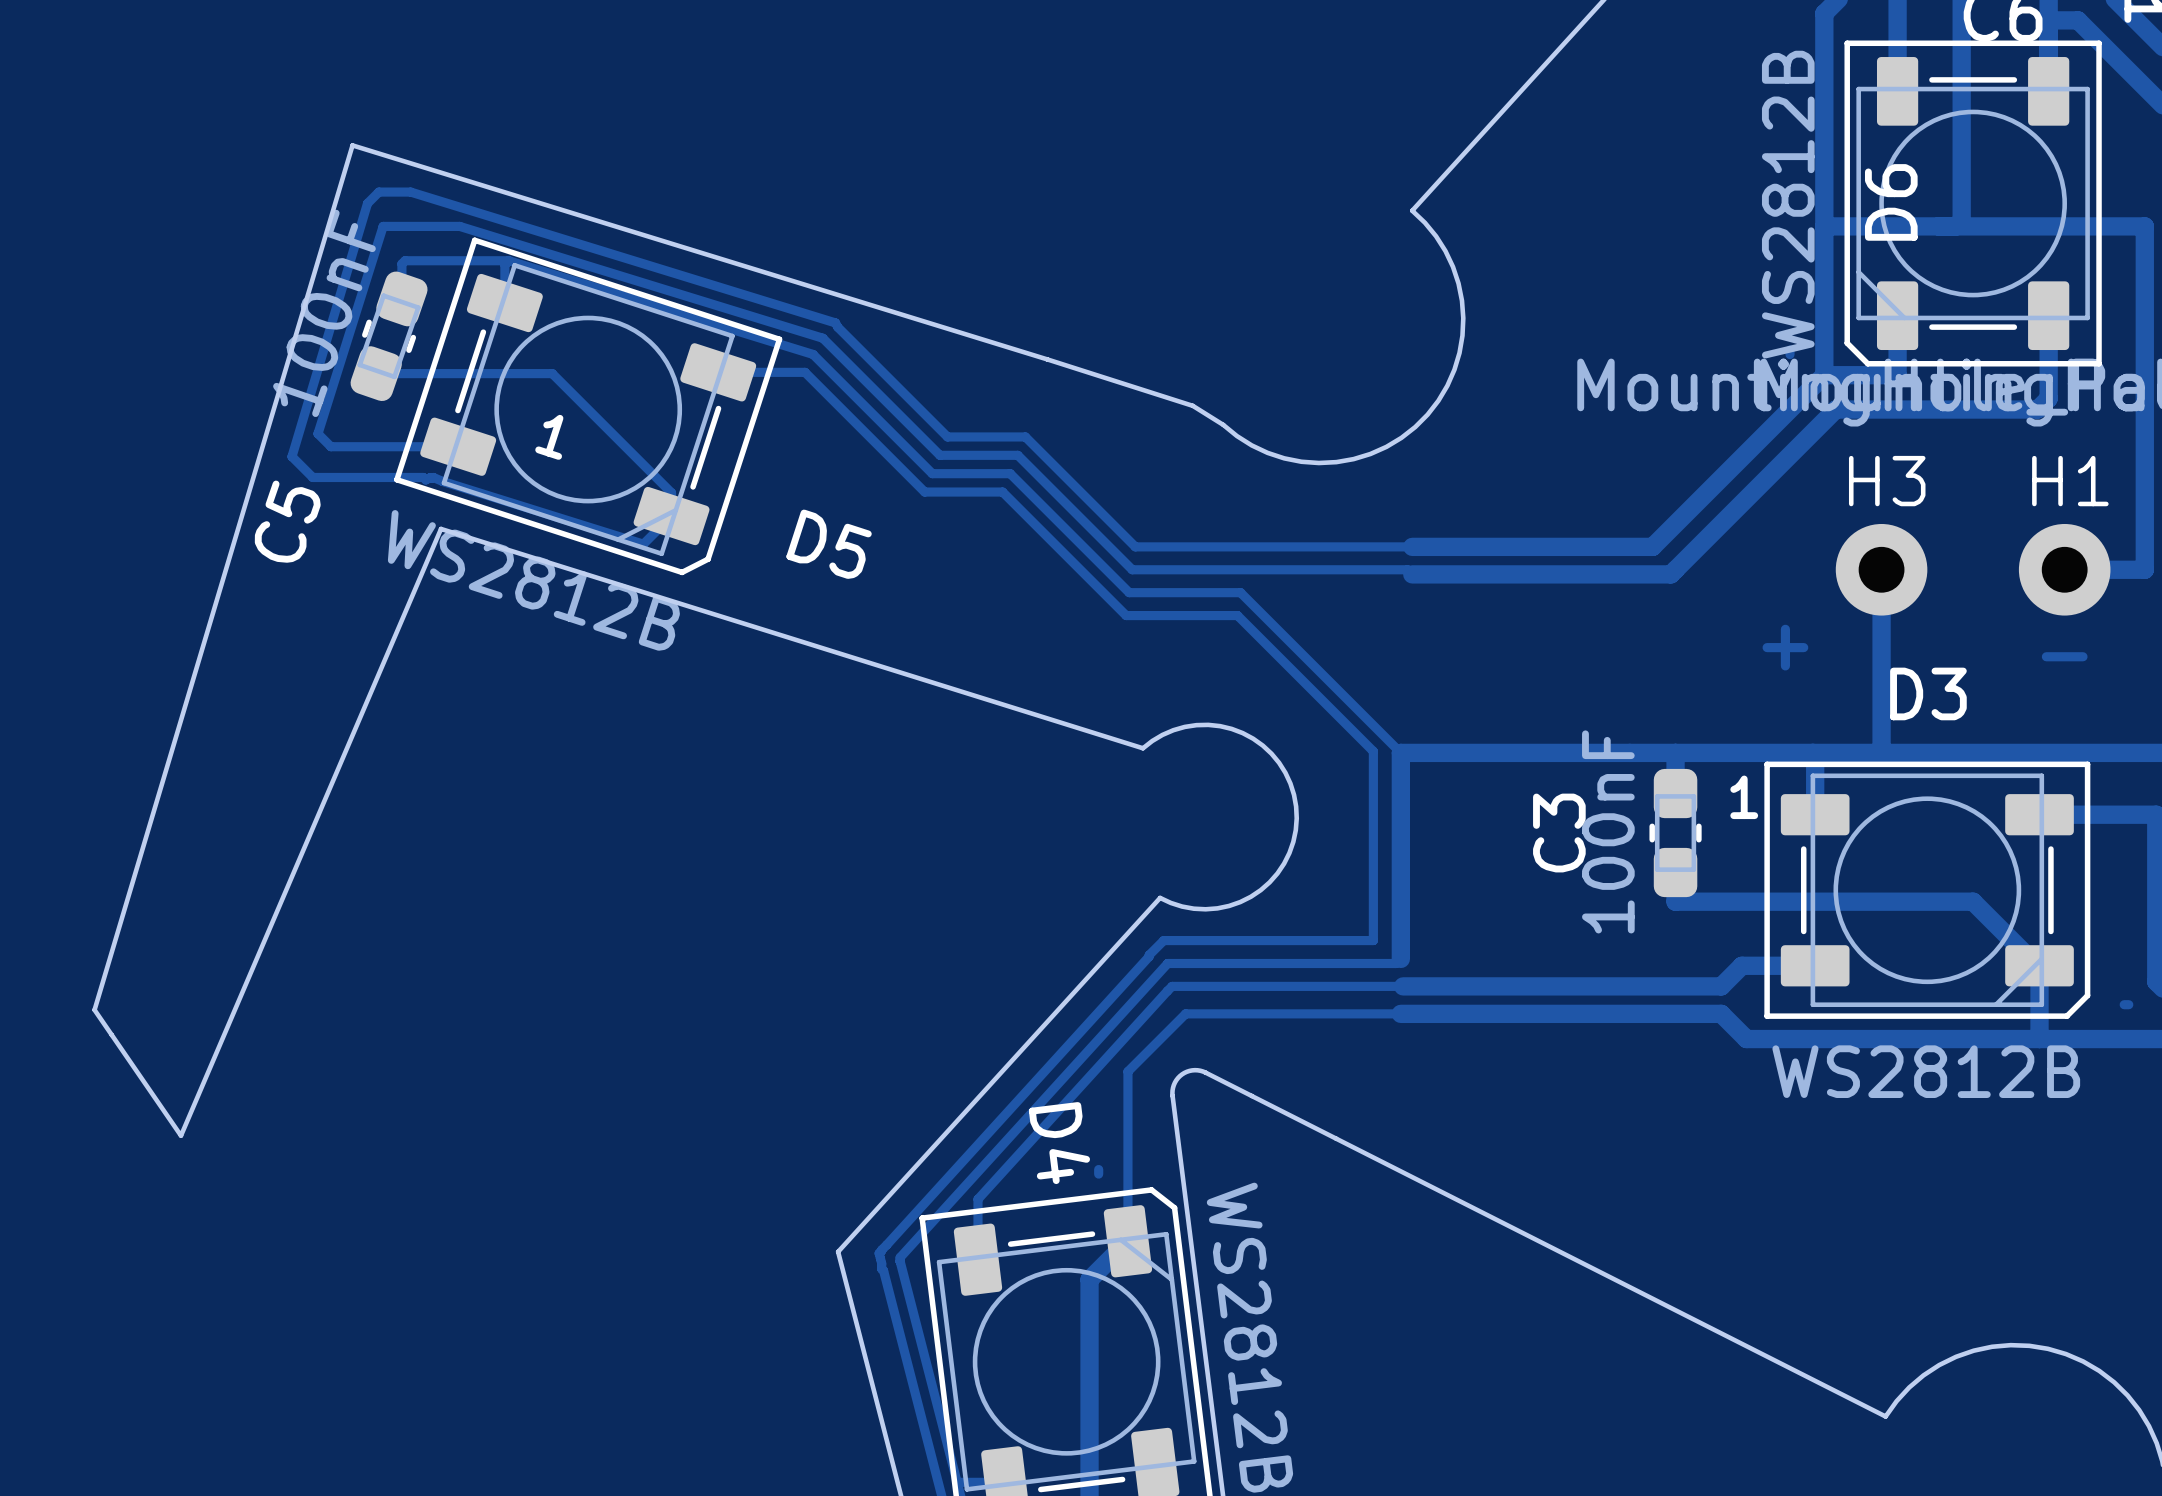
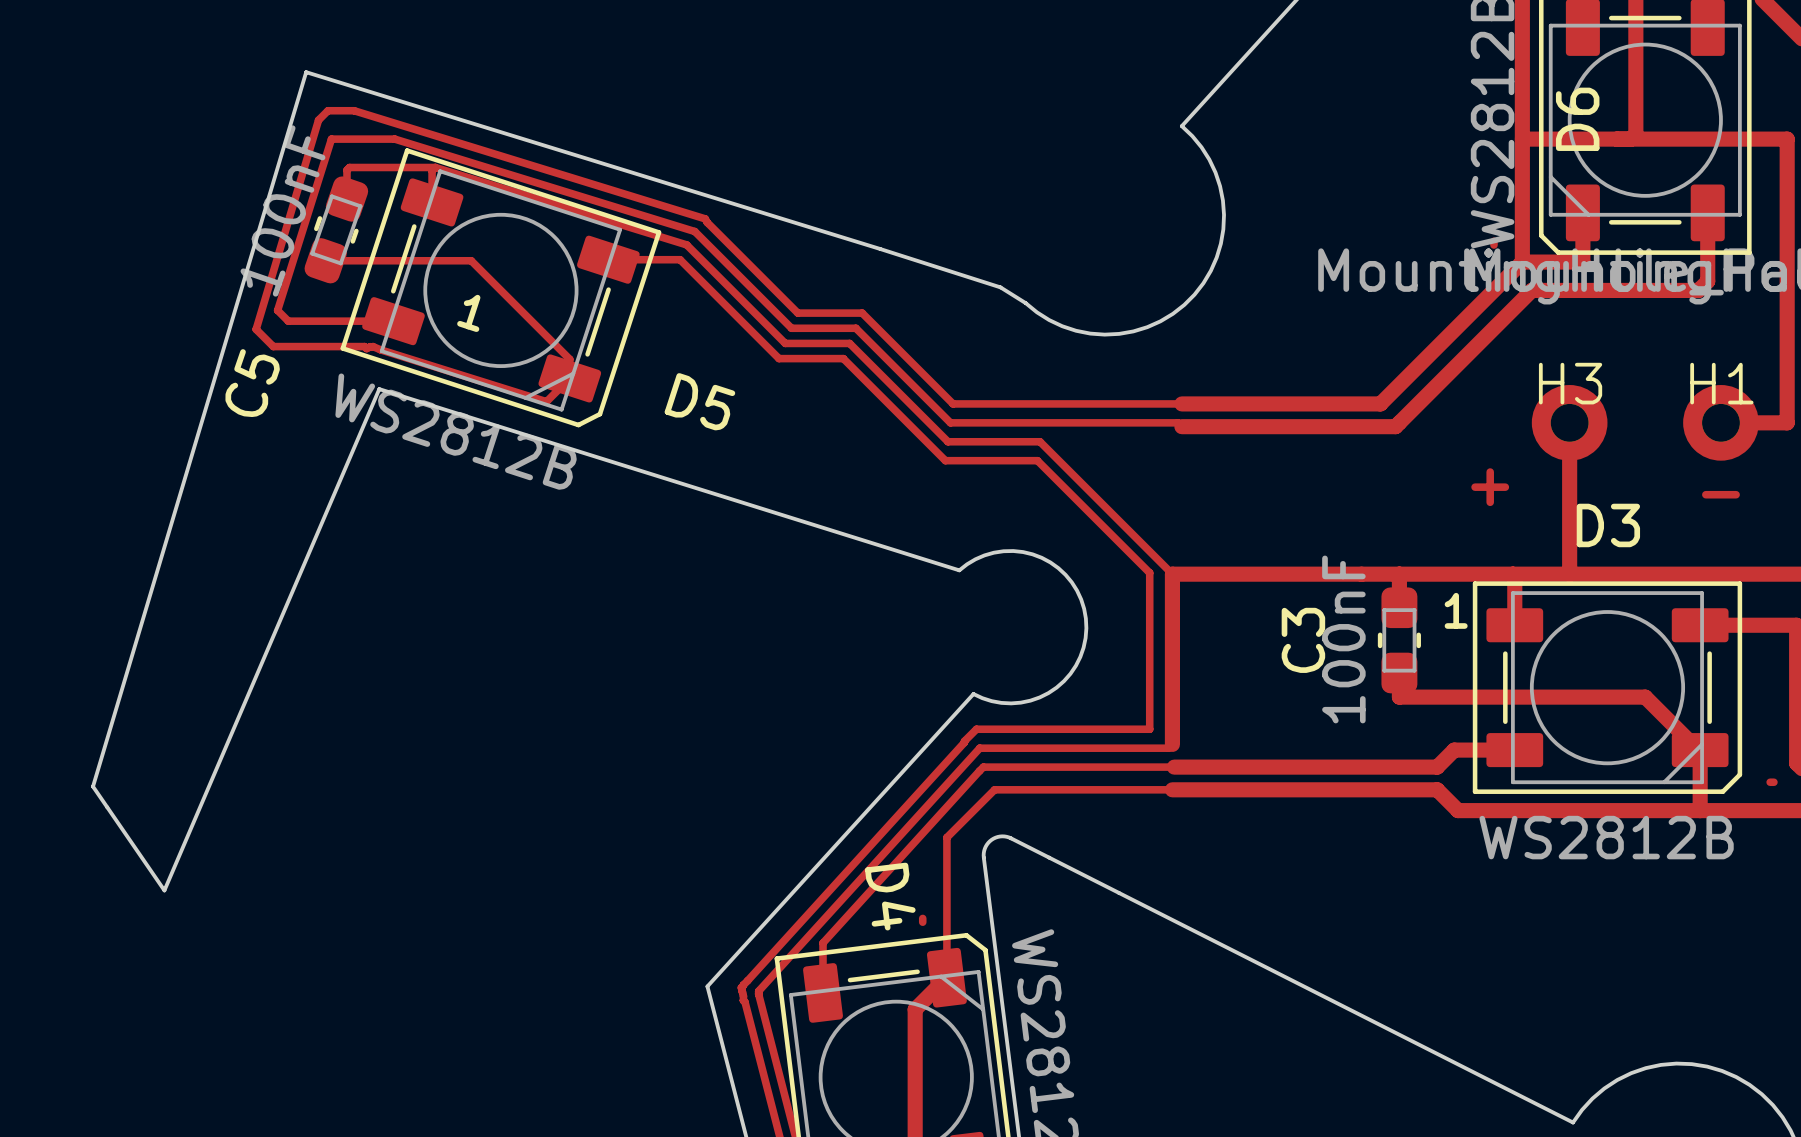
H3 name position: H3 (1887, 481) -> H3 (1570, 383)
H1 name position: H1 (2070, 481) -> H1 (1721, 383)

